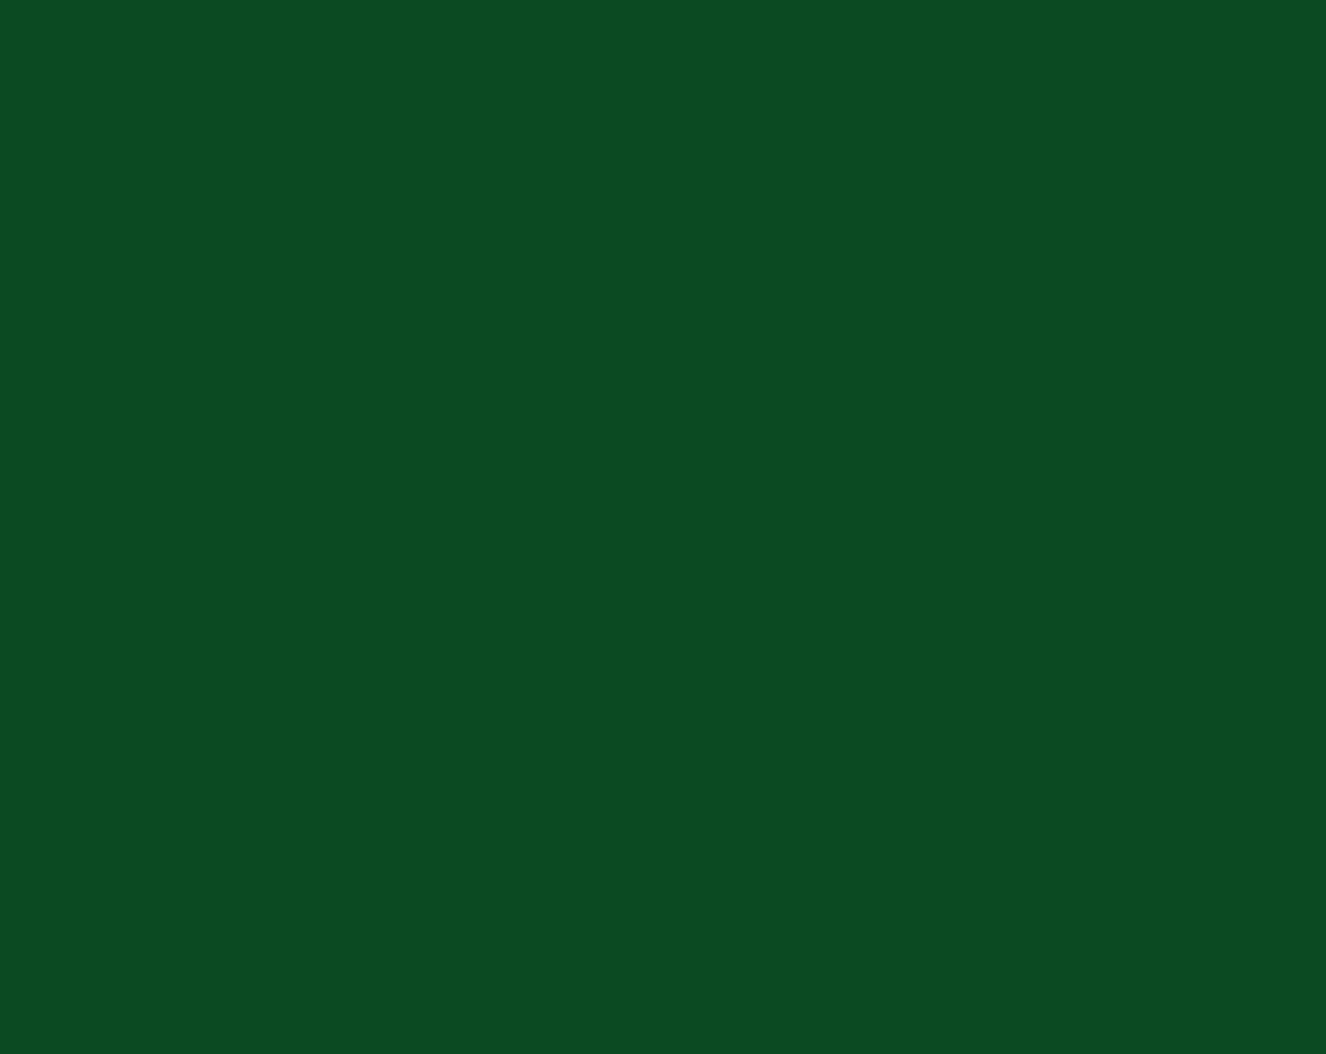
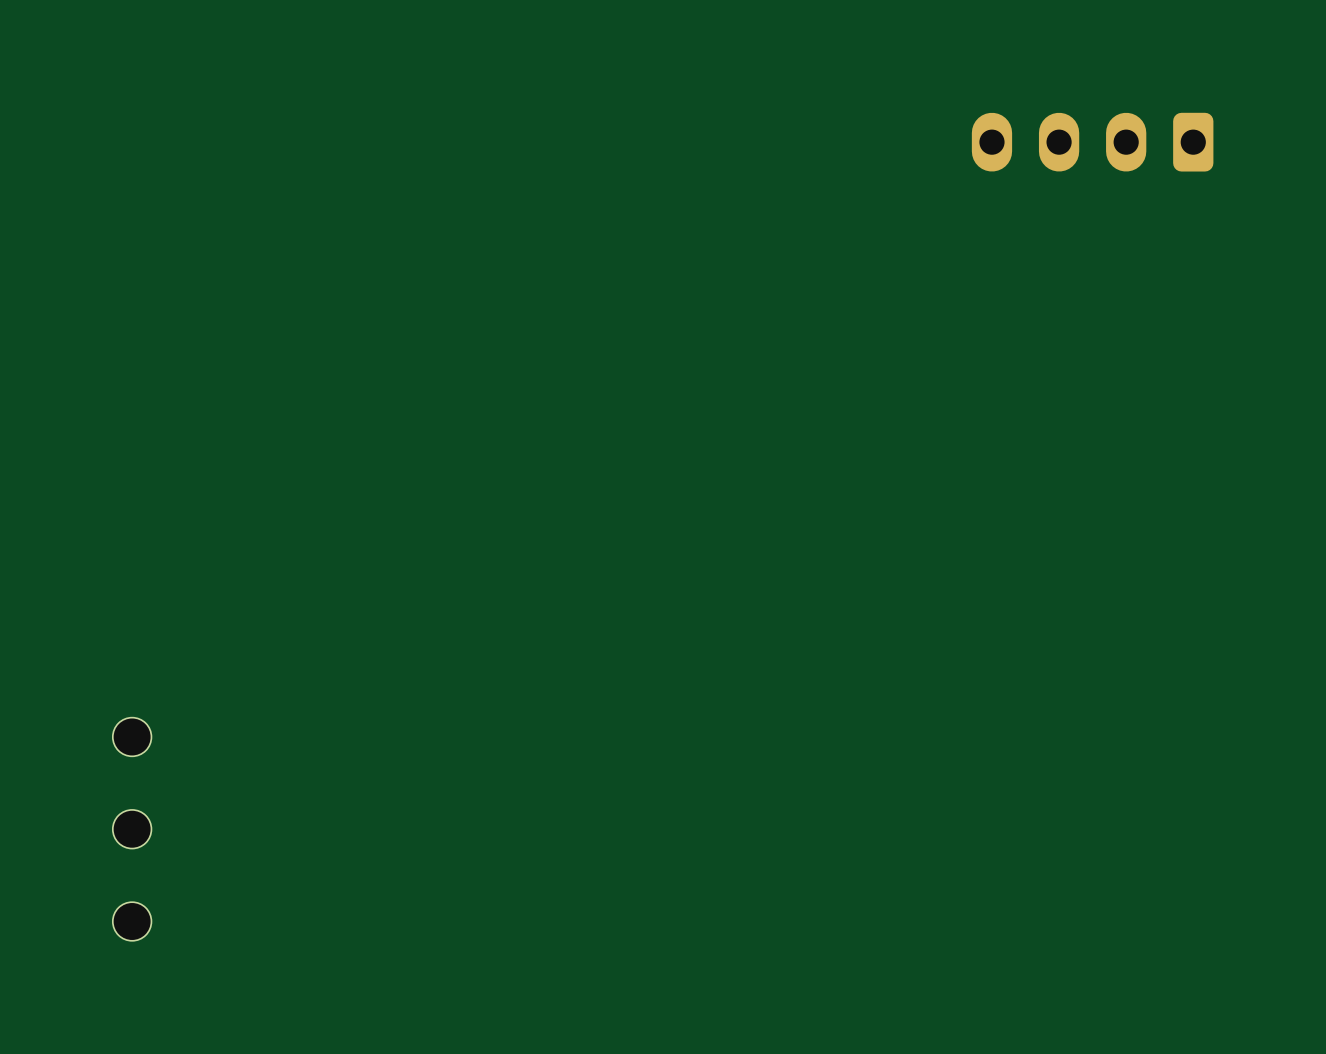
part: none -> (1092, 142)
part: none -> (132, 736)
part: none -> (132, 829)
part: none -> (132, 921)

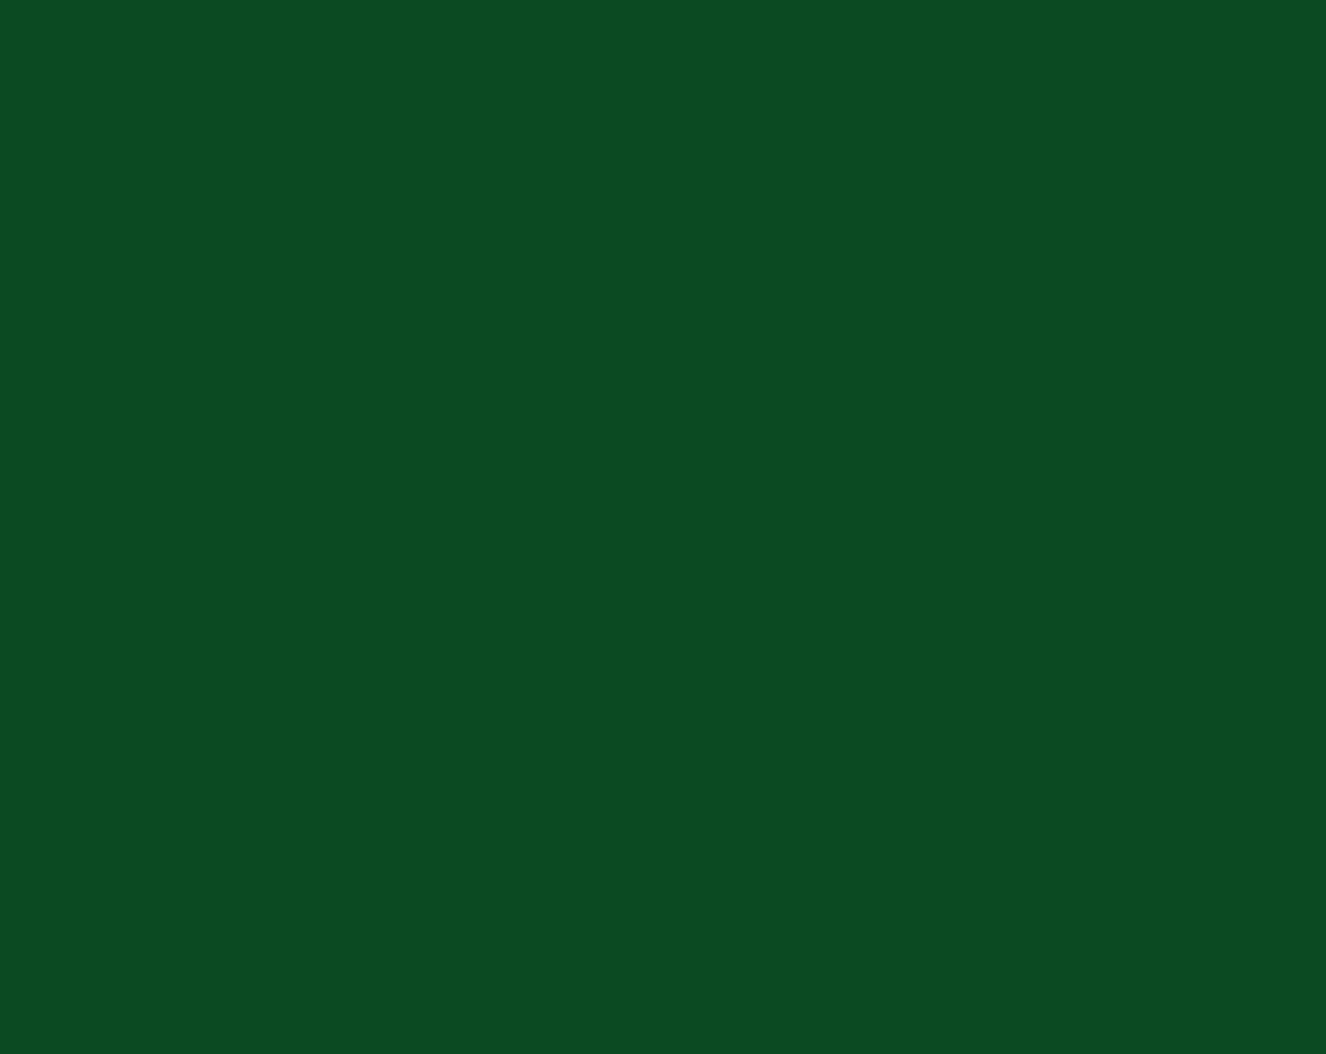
part: (1092, 142) -> none
part: (132, 736) -> none
part: (132, 829) -> none
part: (132, 921) -> none

